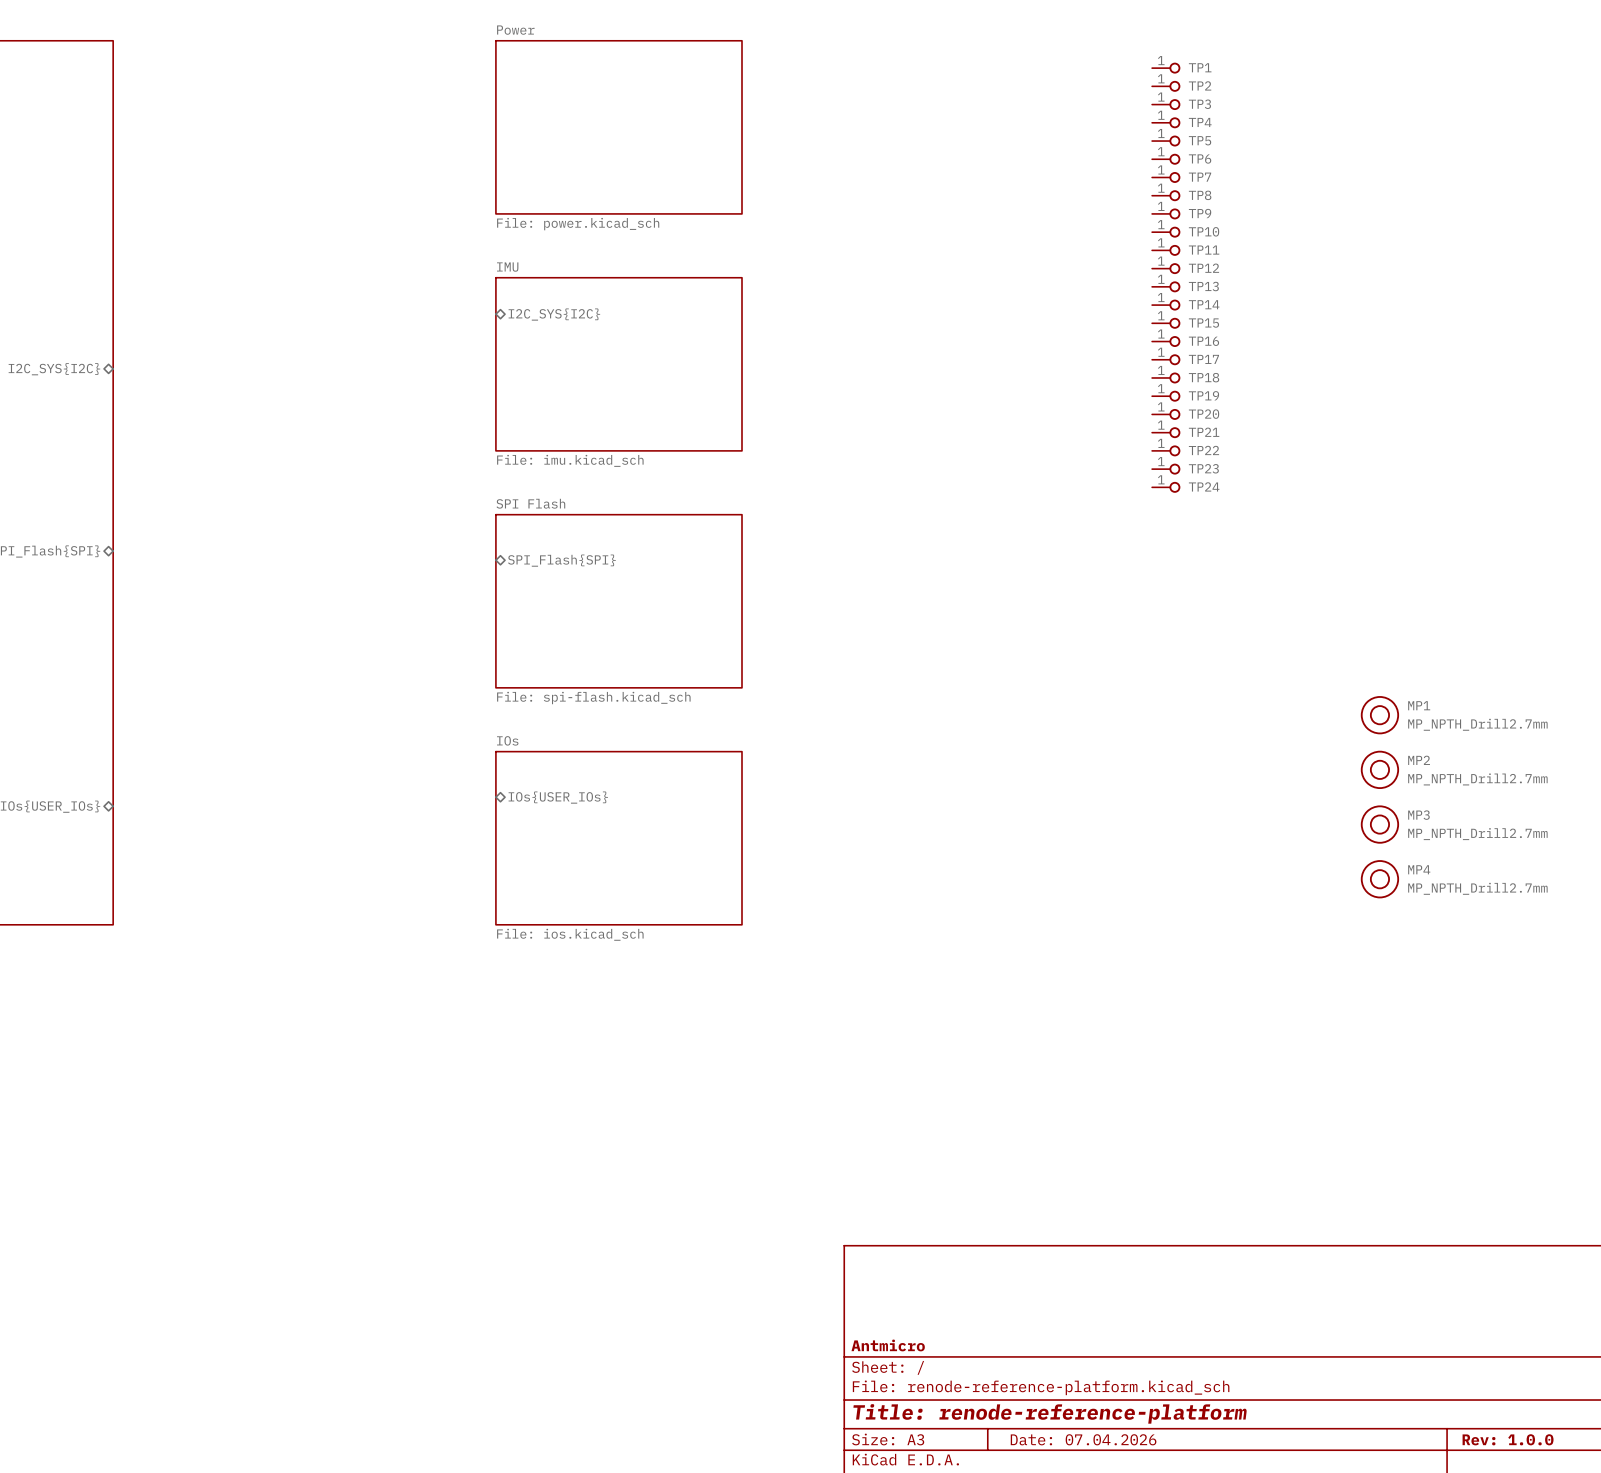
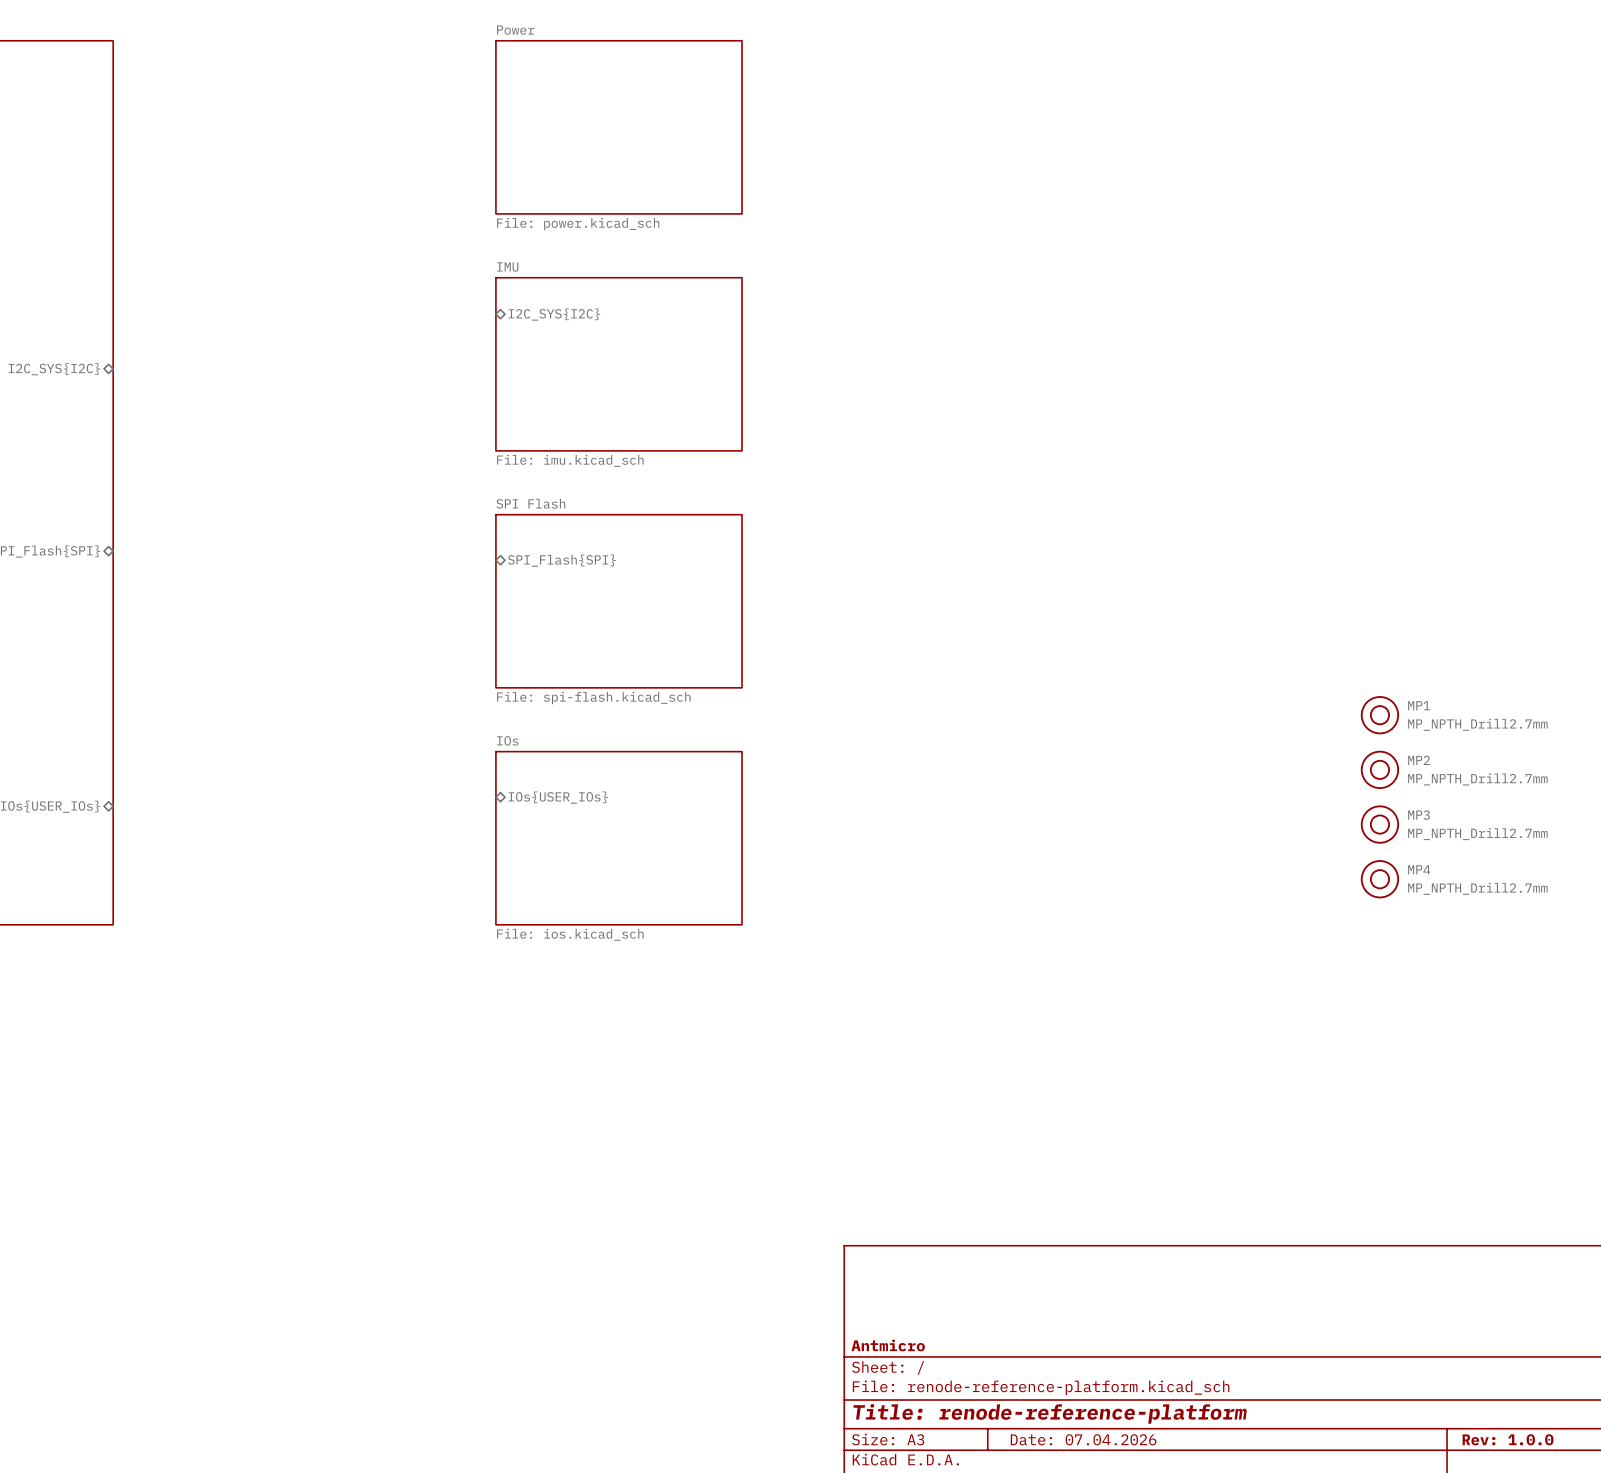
TP1: (1166, 68) -> none
TP2: (1166, 86) -> none
TP3: (1166, 104) -> none
TP4: (1166, 122) -> none
TP5: (1166, 141) -> none
TP6: (1166, 159) -> none
TP7: (1166, 177) -> none
TP8: (1166, 195) -> none
TP9: (1166, 213) -> none
TP10: (1166, 232) -> none
TP11: (1166, 250) -> none
TP12: (1166, 268) -> none
TP13: (1166, 286) -> none
TP14: (1166, 305) -> none
TP15: (1166, 323) -> none
TP16: (1166, 341) -> none
TP17: (1166, 359) -> none
TP18: (1166, 377) -> none
TP19: (1166, 396) -> none
TP20: (1166, 414) -> none
TP21: (1166, 432) -> none
TP22: (1166, 450) -> none
TP23: (1166, 469) -> none
TP24: (1166, 487) -> none

